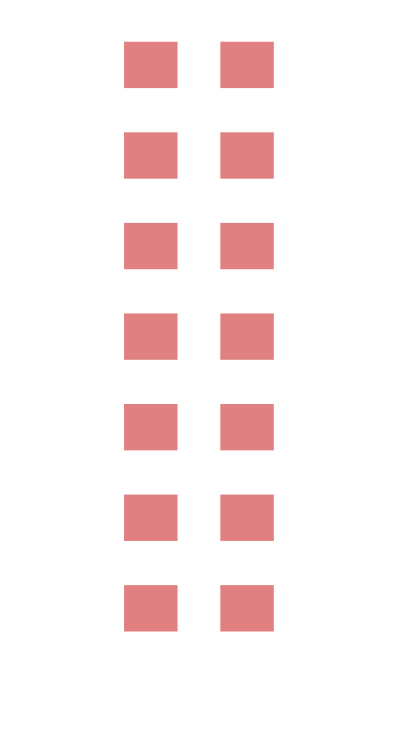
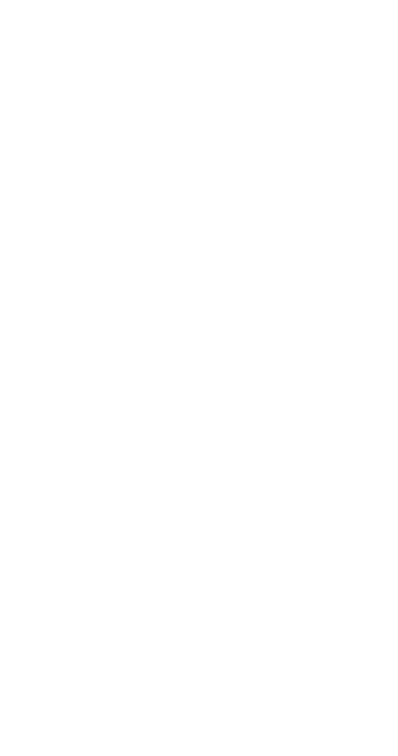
part: (198, 64) -> none
part: (198, 155) -> none
part: (198, 246) -> none
part: (198, 336) -> none
part: (198, 427) -> none
part: (198, 517) -> none
part: (198, 608) -> none

